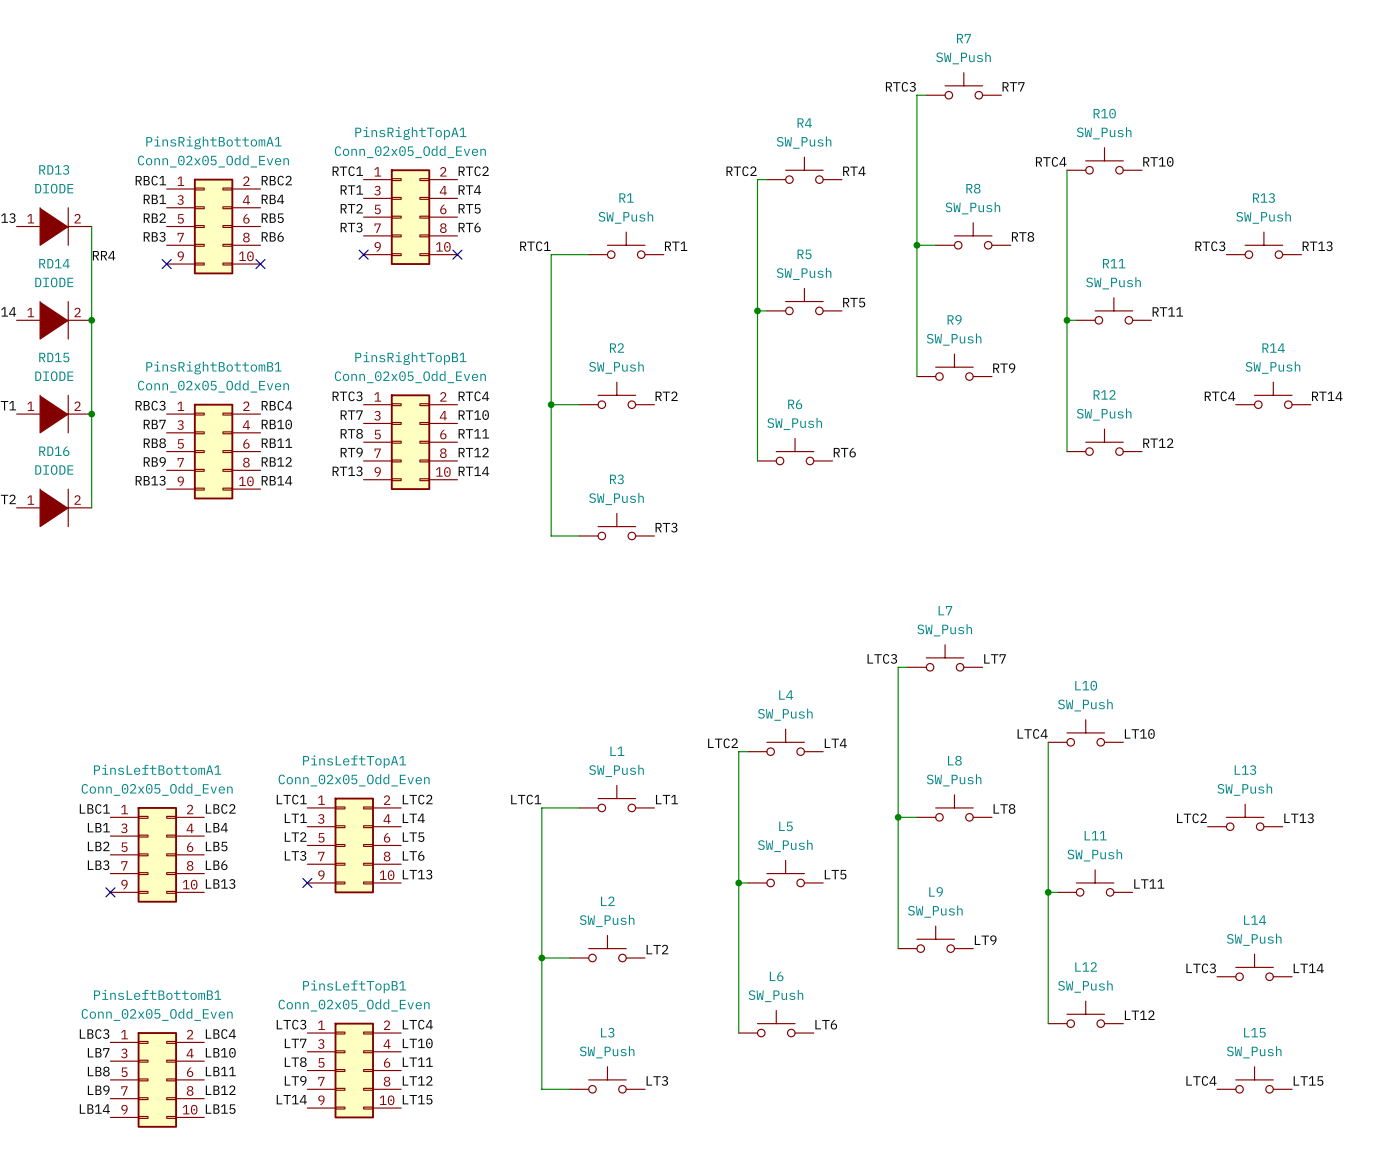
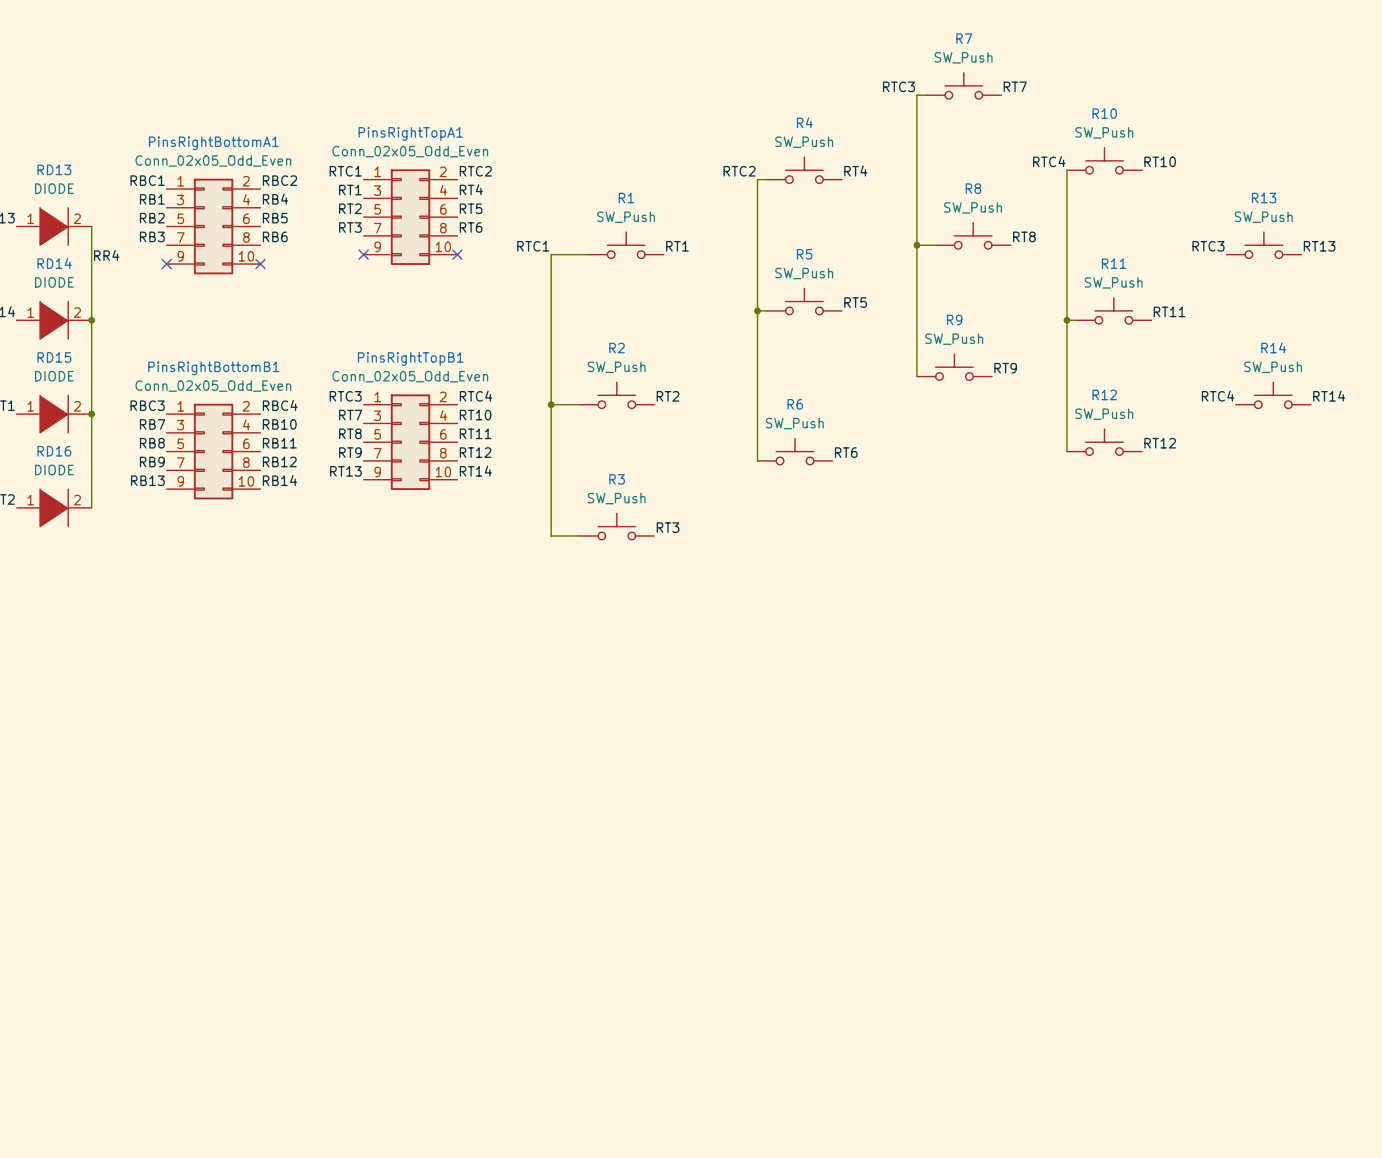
L7: SW_Push (945, 657) -> none
label: LTC3 (882, 658) -> none
label: LT7 (995, 658) -> none
wire: (907, 667) (898, 667) (898, 948) -> none
L10: SW_Push (1085, 732) -> none
label: LTC4 (1032, 733) -> none
label: LT10 (1139, 733) -> none
L4: SW_Push (785, 742) -> none
wire: (1048, 742) (1048, 1023) -> none
label: LTC2 (723, 743) -> none
label: LT4 (835, 743) -> none
wire: (748, 751) (738, 751) (738, 1033) -> none
L1: SW_Push (616, 798) -> none
label: LTC1 (291, 799) -> none
label: LTC2 (417, 799) -> none
label: LTC1 (526, 799) -> none
label: LT1 (666, 799) -> none
wire: (579, 807) (541, 807) (541, 1089) (569, 1089) -> none
L8: SW_Push (954, 807) -> none
label: LBC1 (94, 808) -> none
label: LBC2 (220, 808) -> none
label: LT8 (1004, 808) -> none
wire: (898, 817) (916, 817) -> none
junction: (898, 817) -> none
L13: SW_Push (1245, 817) -> none
label: LT1 (295, 818) -> none
label: LT4 (413, 818) -> none
label: LTC2 (1191, 818) -> none
label: LT13 (1299, 818) -> none
label: LB1 (98, 827) -> none
label: LB4 (216, 827) -> none
label: LT2 (295, 837) -> none
label: LT5 (413, 837) -> none
PinsLeftTopA1: Conn_02x05_Odd_Even (354, 845) -> none
label: LB2 (98, 846) -> none
label: LB5 (216, 846) -> none
PinsLeftBottomA1: Conn_02x05_Odd_Even (157, 854) -> none
label: LT3 (295, 855) -> none
label: LT6 (413, 855) -> none
label: LB3 (98, 865) -> none
label: LB6 (216, 865) -> none
L5: SW_Push (785, 873) -> none
label: LT13 (417, 874) -> none
label: LT5 (835, 874) -> none
no-connect mark: (307, 882) -> none
wire: (738, 882) (748, 882) -> none
junction: (738, 882) -> none
L11: SW_Push (1095, 882) -> none
label: LB13 (220, 883) -> none
label: LT11 (1149, 883) -> none
no-connect mark: (110, 892) -> none
wire: (1048, 892) (1057, 892) -> none
junction: (1048, 892) -> none
L9: SW_Push (935, 939) -> none
label: LT9 (985, 940) -> none
L2: SW_Push (607, 948) -> none
label: LT2 (657, 949) -> none
wire: (541, 958) (569, 958) -> none
junction: (541, 958) -> none
L14: SW_Push (1254, 967) -> none
label: LTC3 (1201, 968) -> none
label: LT14 (1308, 968) -> none
L12: SW_Push (1085, 1014) -> none
label: LT12 (1139, 1015) -> none
L6: SW_Push (776, 1023) -> none
label: LTC3 (291, 1024) -> none
label: LTC4 (417, 1024) -> none
label: LT6 (826, 1024) -> none
label: LBC3 (94, 1034) -> none
label: LBC4 (220, 1034) -> none
label: LT7 (295, 1043) -> none
label: LT10 (417, 1043) -> none
label: LB7 (98, 1052) -> none
label: LB10 (220, 1052) -> none
label: LT8 (295, 1062) -> none
label: LT11 (417, 1062) -> none
PinsLeftTopB1: Conn_02x05_Odd_Even (354, 1070) -> none
label: LB8 (98, 1071) -> none
label: LB11 (220, 1071) -> none
PinsLeftBottomB1: Conn_02x05_Odd_Even (157, 1079) -> none
L3: SW_Push (607, 1079) -> none
L15: SW_Push (1254, 1079) -> none
label: LT9 (295, 1080) -> none
label: LT12 (417, 1080) -> none
label: LT3 (657, 1080) -> none
label: LTC4 (1201, 1080) -> none
label: LT15 (1308, 1081) -> none
label: LB9 (98, 1090) -> none
label: LB12 (220, 1090) -> none
label: LT14 (291, 1099) -> none
label: LT15 (417, 1099) -> none
label: LB14 (94, 1109) -> none
label: LB15 (220, 1109) -> none

